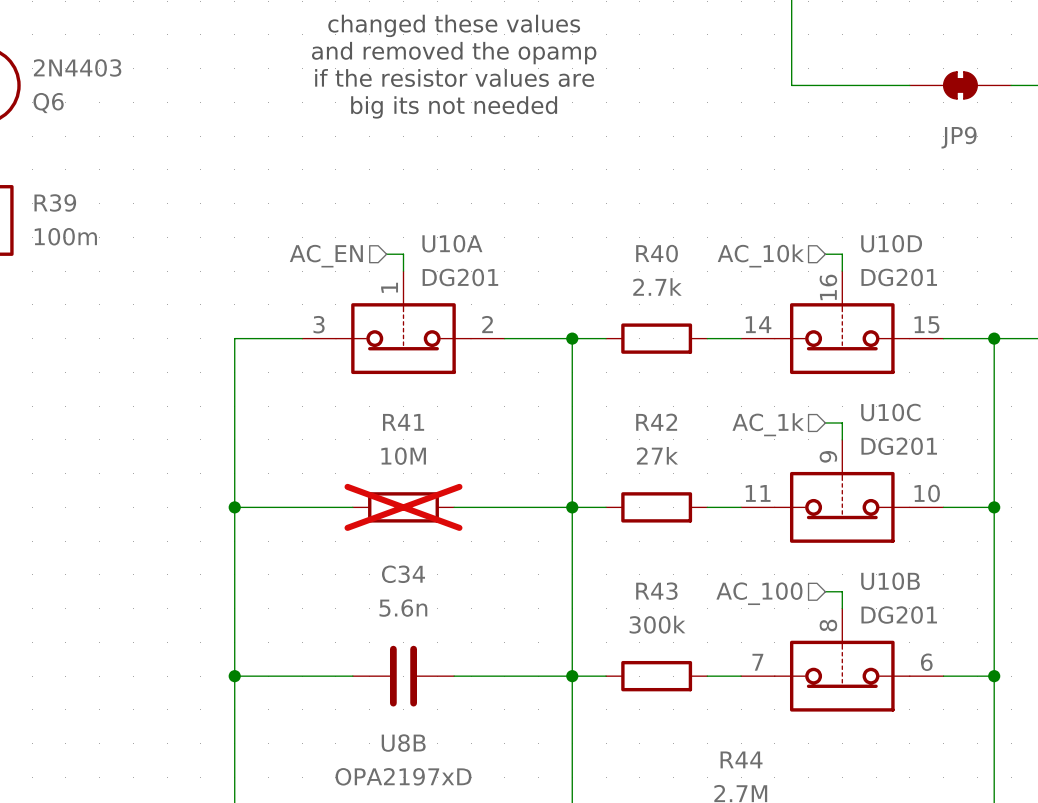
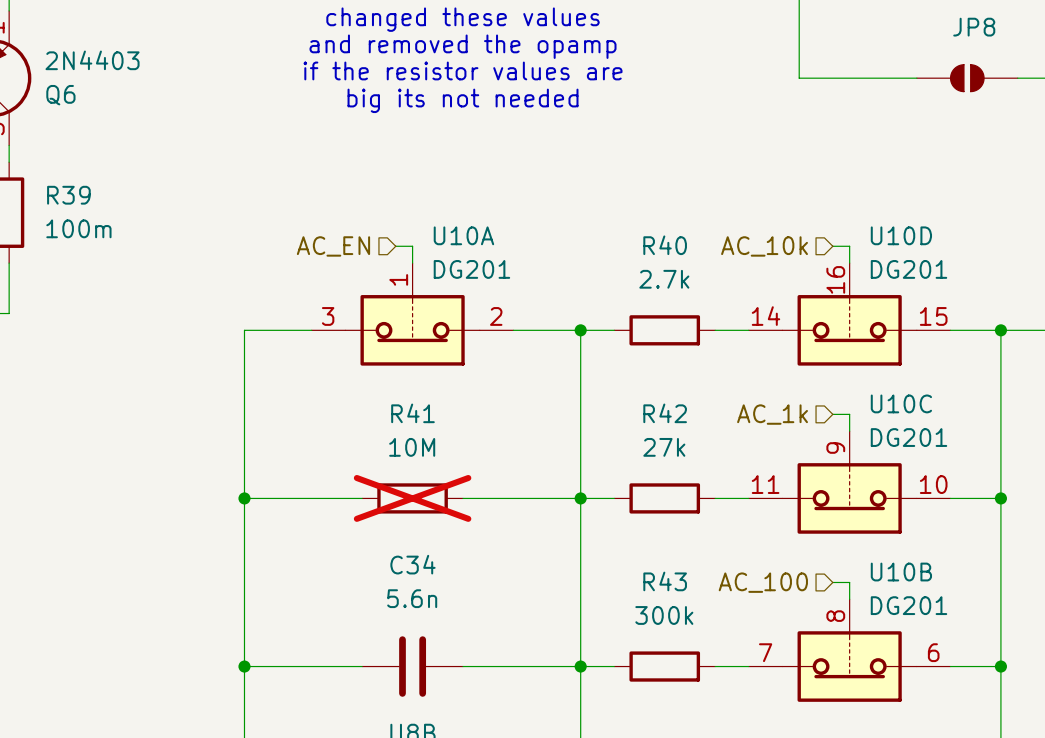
JP9: (960, 85) -> none
JP8: none -> (967, 78)

